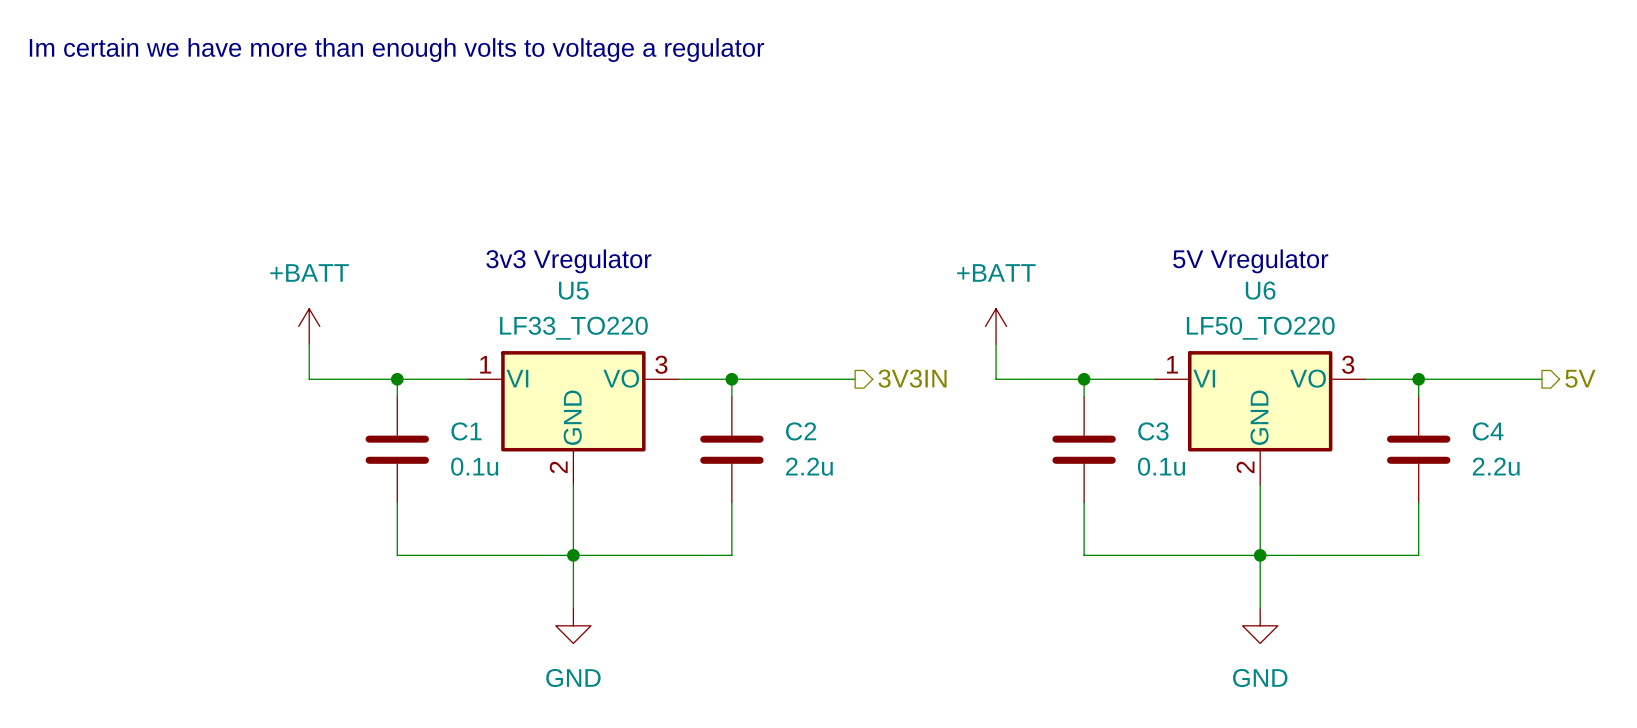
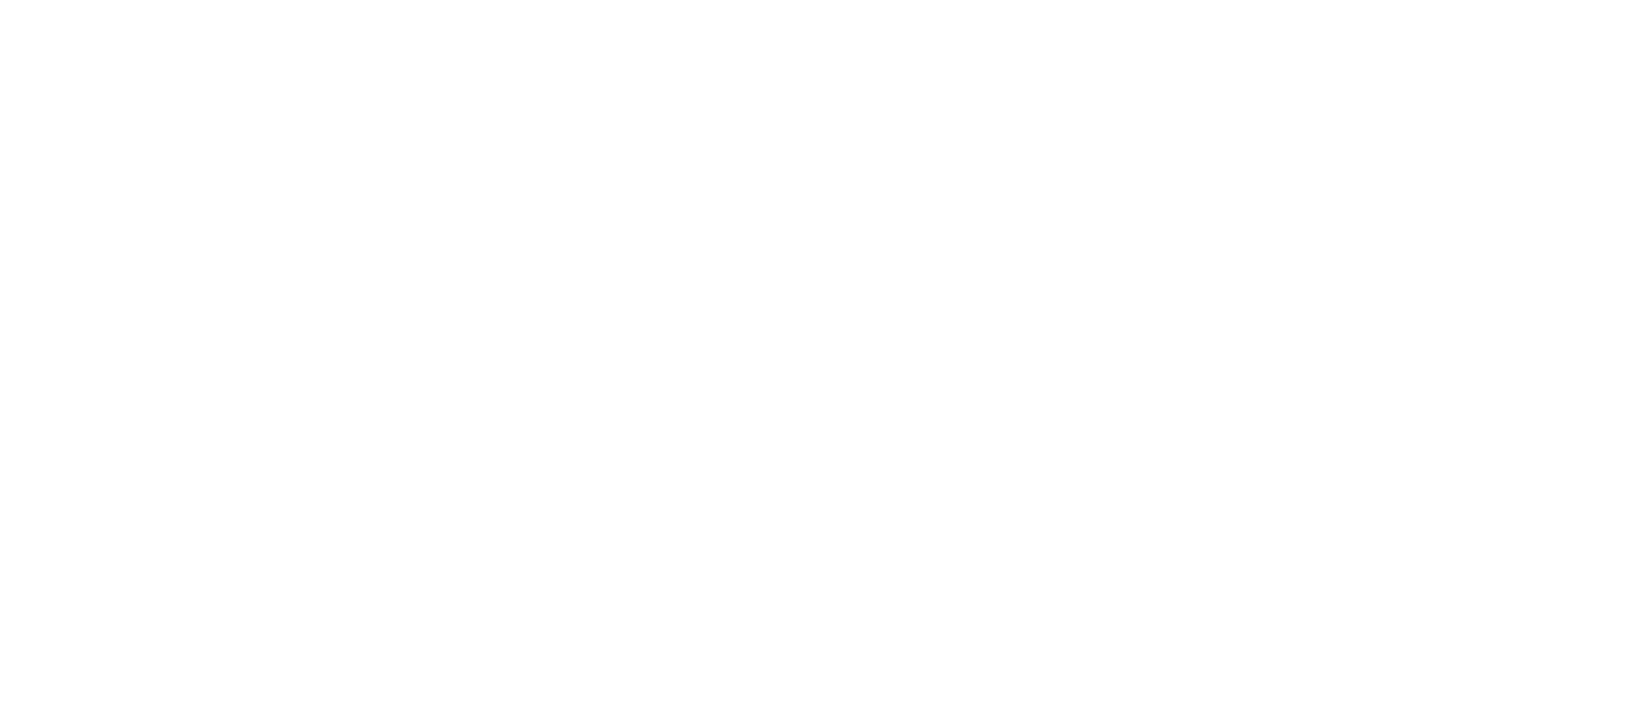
text: Im certain we have more than enough volts to voltage a regulator (396, 50) -> none
text: 3v3 Vregulator (568, 261) -> none
text: 5V Vregulator (1250, 261) -> none
power symbol: +BATT (309, 326) -> none
power symbol: +BATT (996, 326) -> none
wire: (309, 344) (309, 379) (467, 379) -> none
wire: (996, 344) (996, 379) (1154, 379) -> none
hierarchical label: 3V3IN (912, 378) -> none
hierarchical label: 5V (1580, 378) -> none
wire: (397, 379) (397, 396) -> none
junction: (397, 379) -> none
wire: (679, 379) (855, 379) -> none
wire: (731, 379) (731, 396) -> none
junction: (731, 379) -> none
wire: (1084, 379) (1084, 396) -> none
junction: (1084, 379) -> none
wire: (1365, 379) (1541, 379) -> none
wire: (1418, 379) (1418, 396) -> none
junction: (1418, 379) -> none
U5: LF33_TO220 (573, 418) -> none
U6: LF50_TO220 (1260, 418) -> none
C1: 0.1u (397, 449) -> none
C2: 2.2u (731, 449) -> none
C3: 0.1u (1084, 449) -> none
C4: 2.2u (1418, 449) -> none
wire: (573, 484) (573, 608) -> none
wire: (1260, 484) (1260, 608) -> none
wire: (397, 502) (397, 555) (731, 555) (731, 502) -> none
wire: (1084, 502) (1084, 555) (1418, 555) (1418, 502) -> none
junction: (573, 555) -> none
junction: (1260, 555) -> none
power symbol: GND (573, 625) -> none
power symbol: GND (1260, 625) -> none

